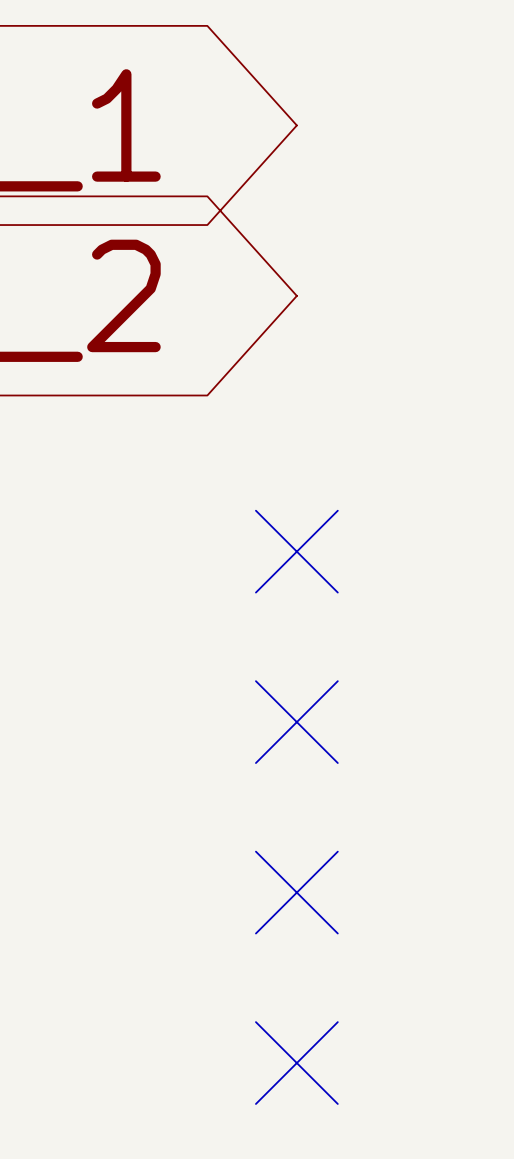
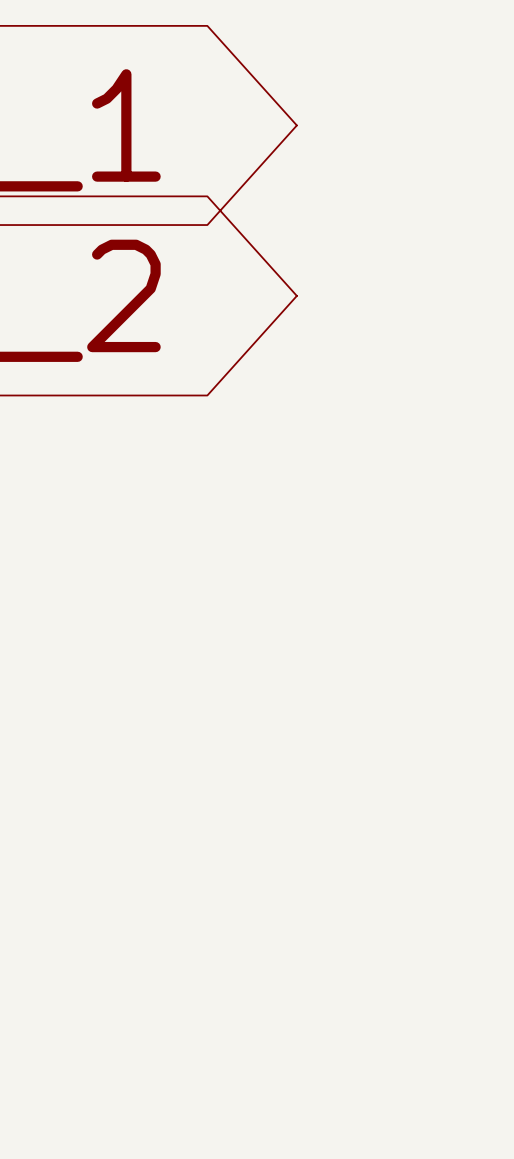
no-connect mark: (296, 551) -> none
no-connect mark: (296, 722) -> none
no-connect mark: (296, 892) -> none
no-connect mark: (296, 1063) -> none

